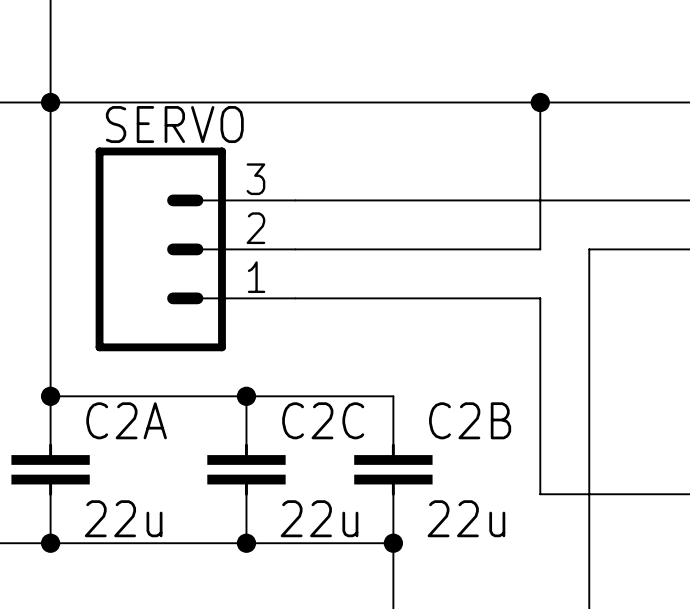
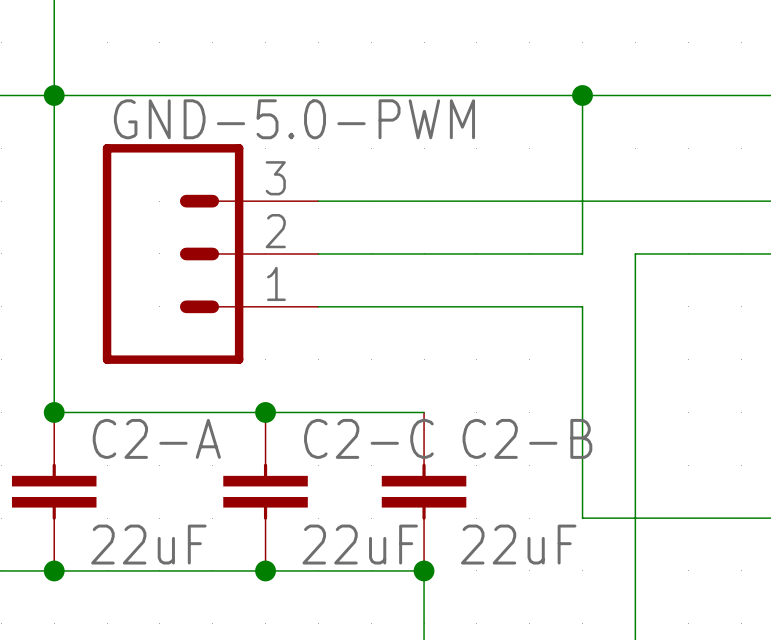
SERVO name: SERVO (174, 124) -> GND-5.0-PWM (294, 119)
C2A name: C2A (126, 420) -> C2-A (156, 438)
C2C name: C2C (323, 420) -> C2-C (368, 438)
C2B name: C2B (470, 420) -> C2-B (527, 438)
C2A value: 22u (123, 518) -> 22uF (148, 544)
C2C value: 22u (319, 518) -> 22uF (360, 544)
C2B value: 22u (466, 518) -> 22uF (518, 544)

